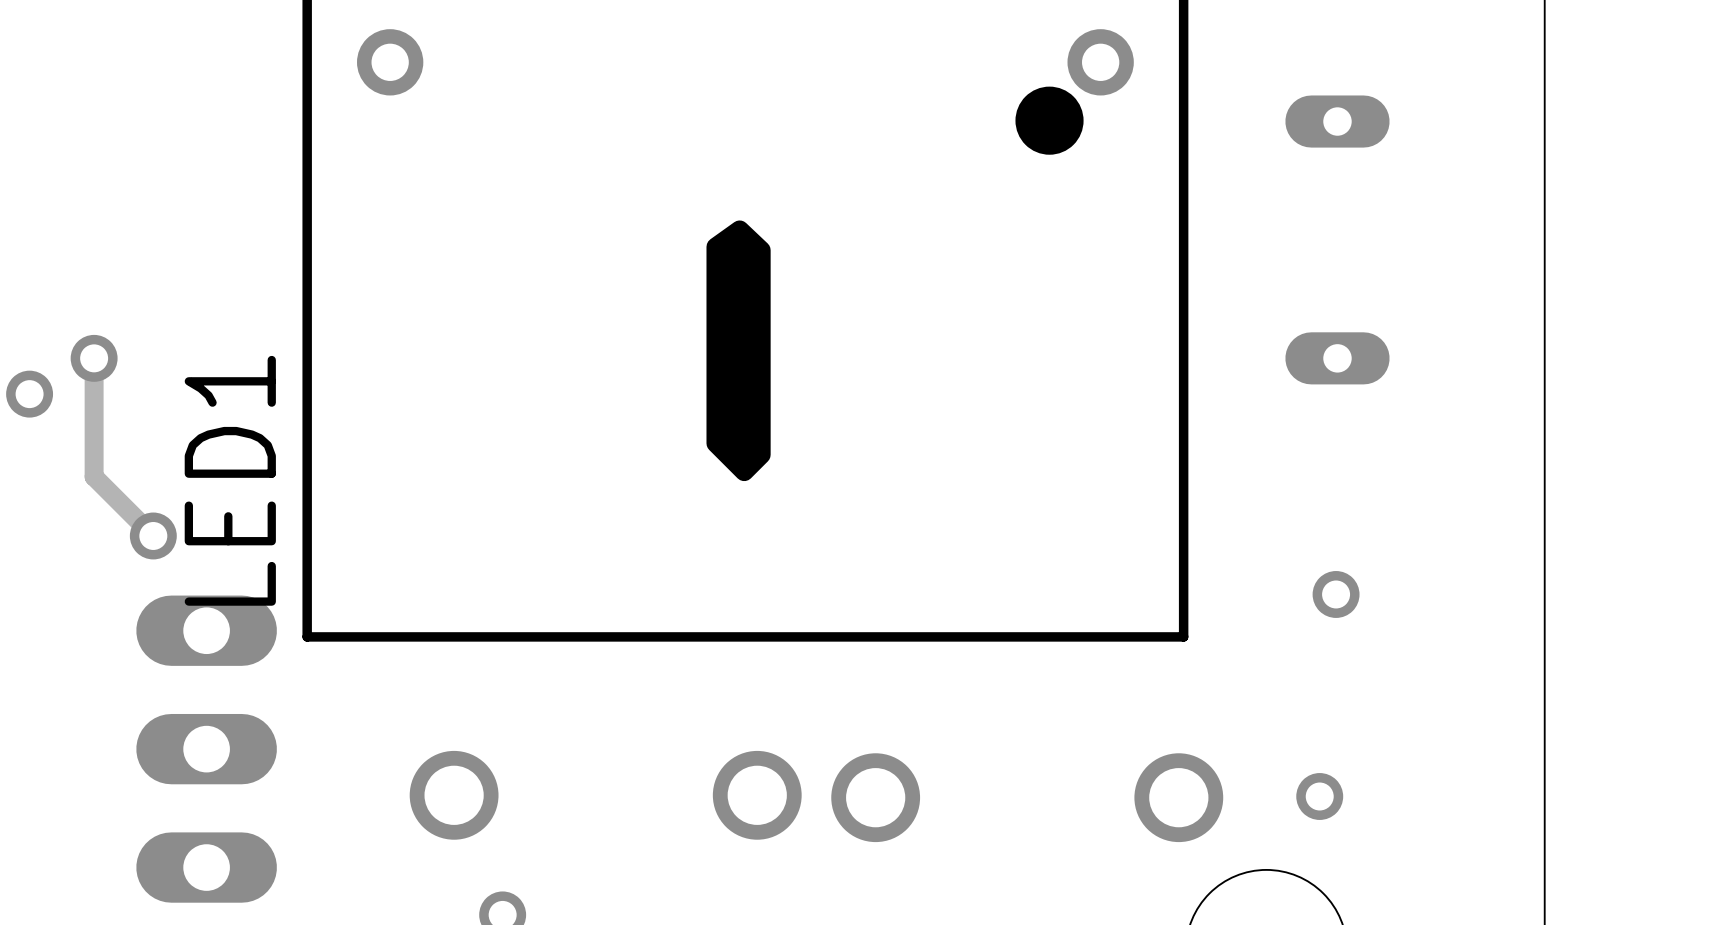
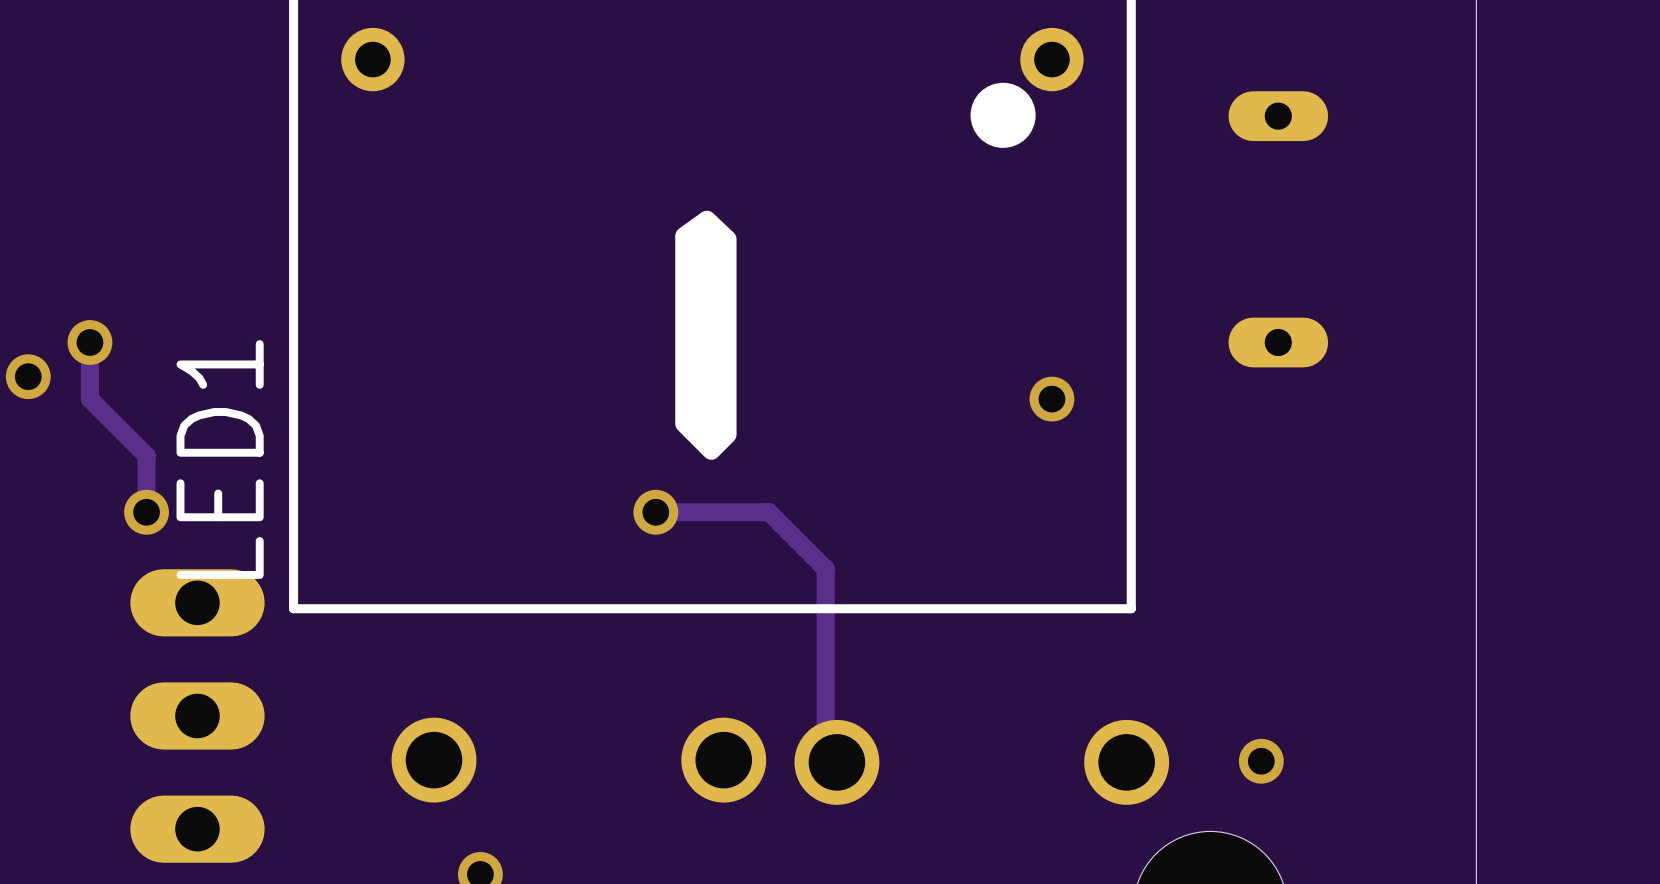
track: (94, 417) (94, 476) (153, 535) -> (89, 399) (146, 455) (146, 512)
via: none -> (1051, 399)
track: none -> (655, 512) (769, 512) (825, 568) (825, 751) (836, 762)
via: none -> (655, 512)
via: (1336, 594) -> none

